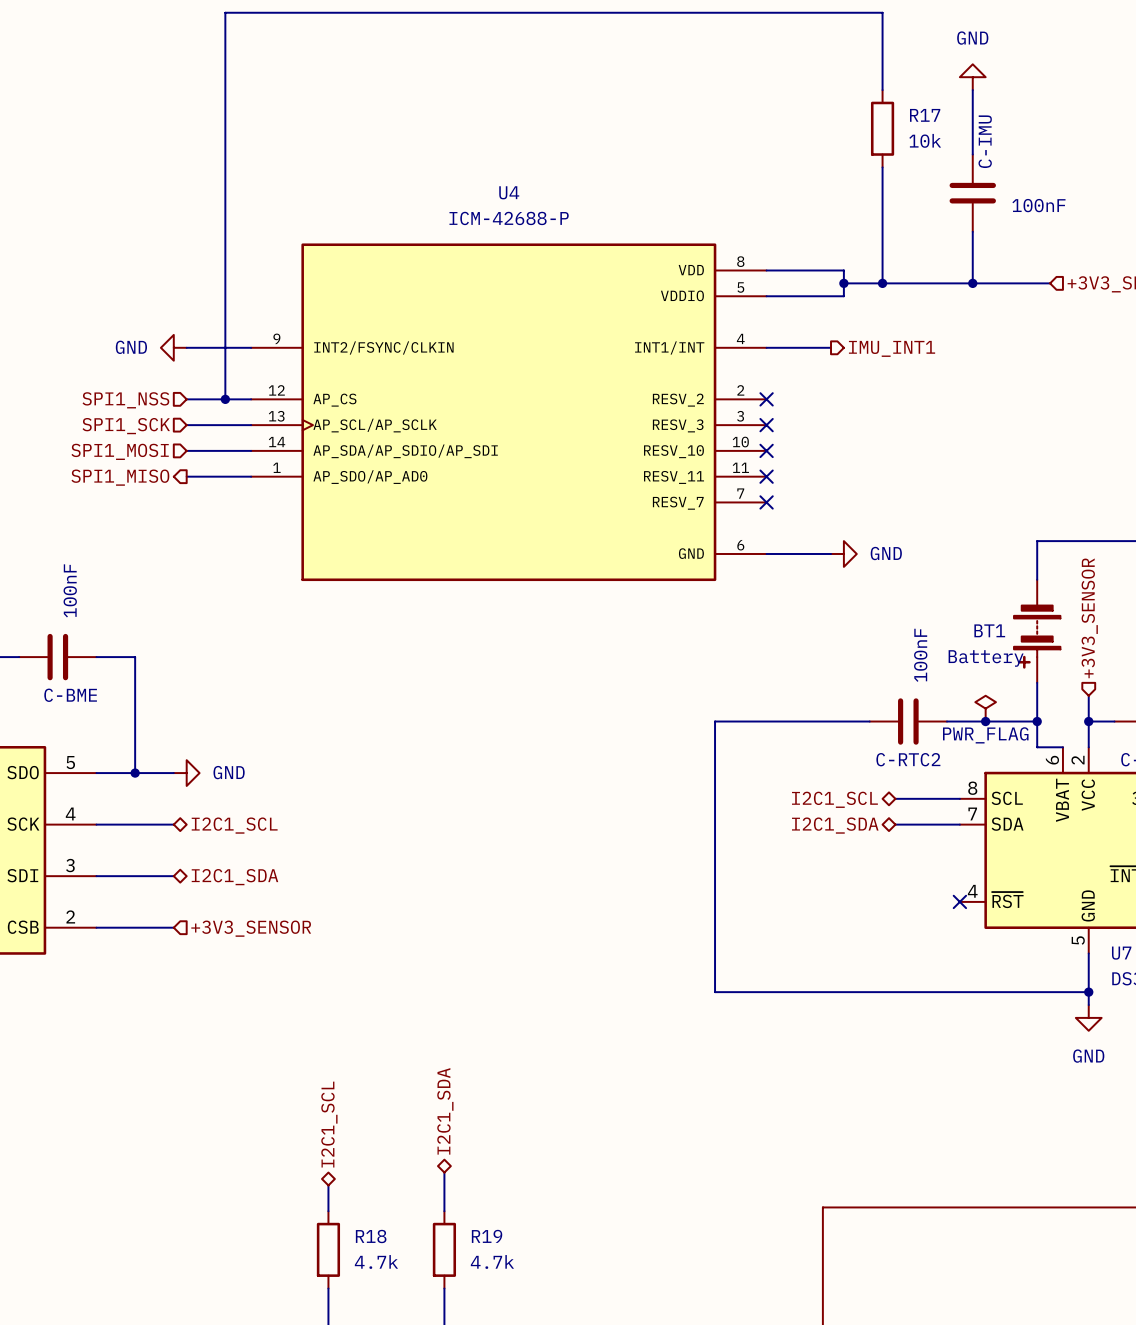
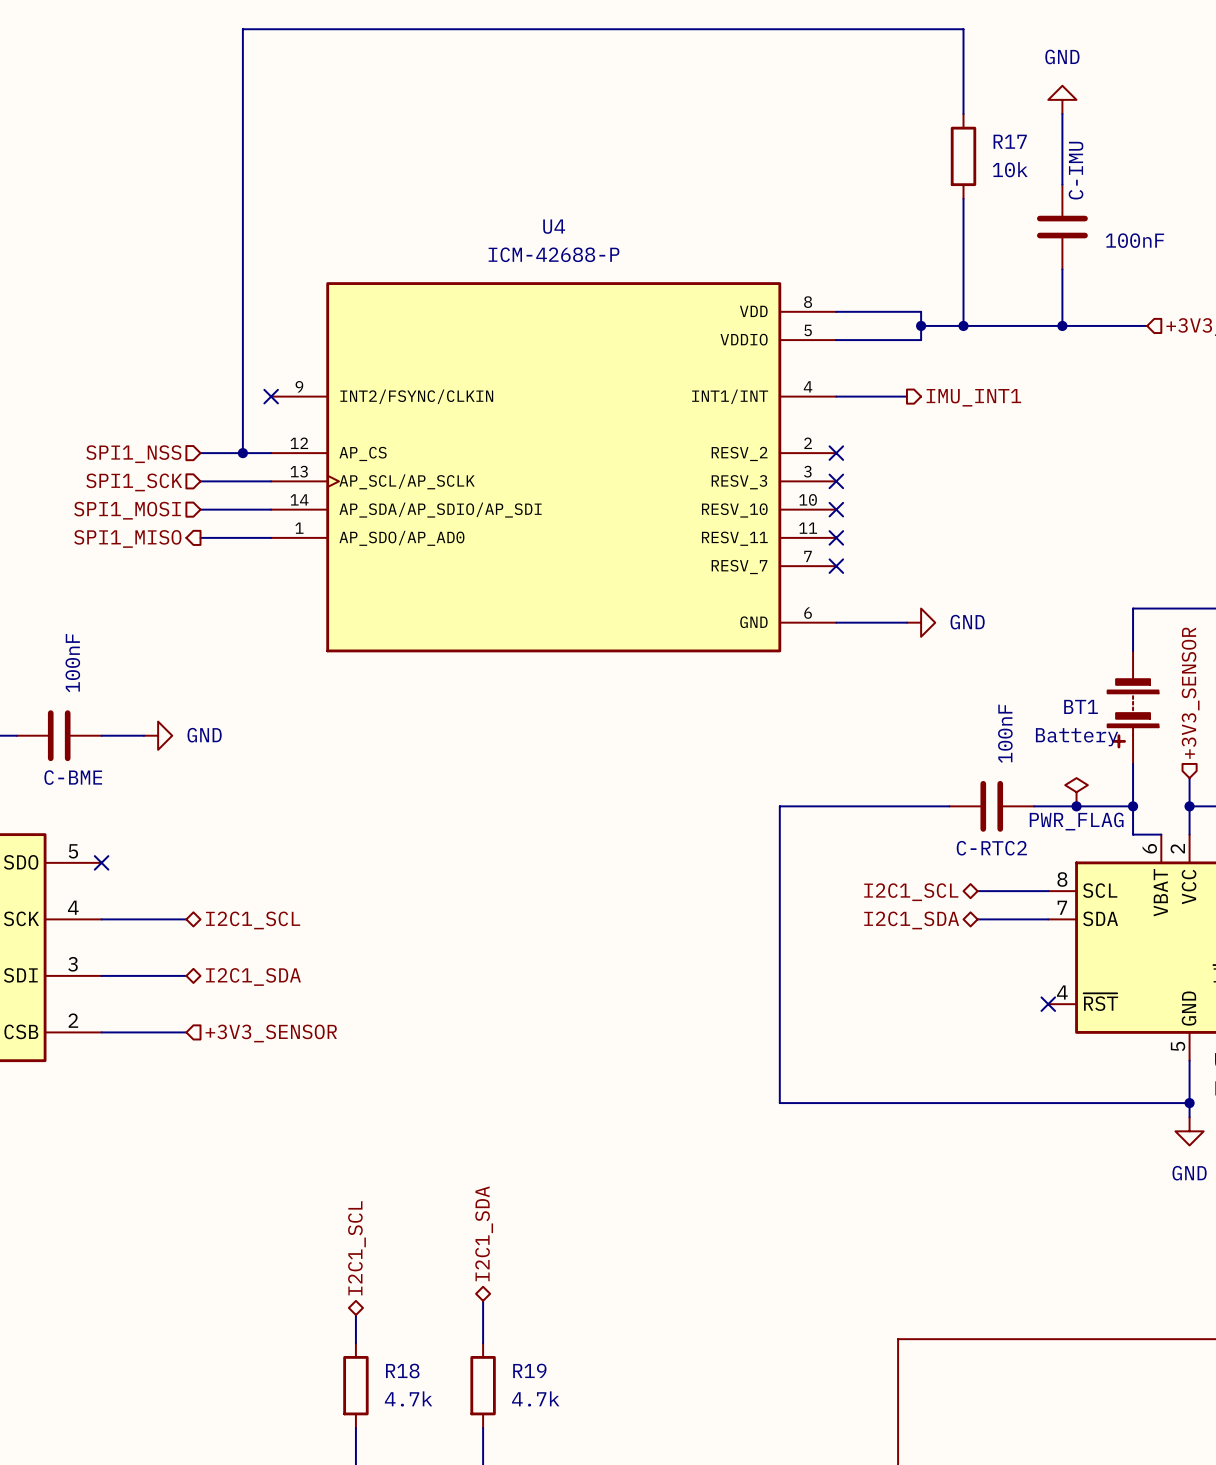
power symbol: GND (173, 347) -> none
wire: (186, 347) (251, 347) -> none
no-connect mark: none -> (271, 396)
wire: (135, 657) (135, 773) -> none
wire: (96, 773) (173, 773) -> none
no-connect mark: none -> (101, 862)
junction: (135, 773) -> none
power symbol position: GND (186, 773) -> GND (158, 735)

